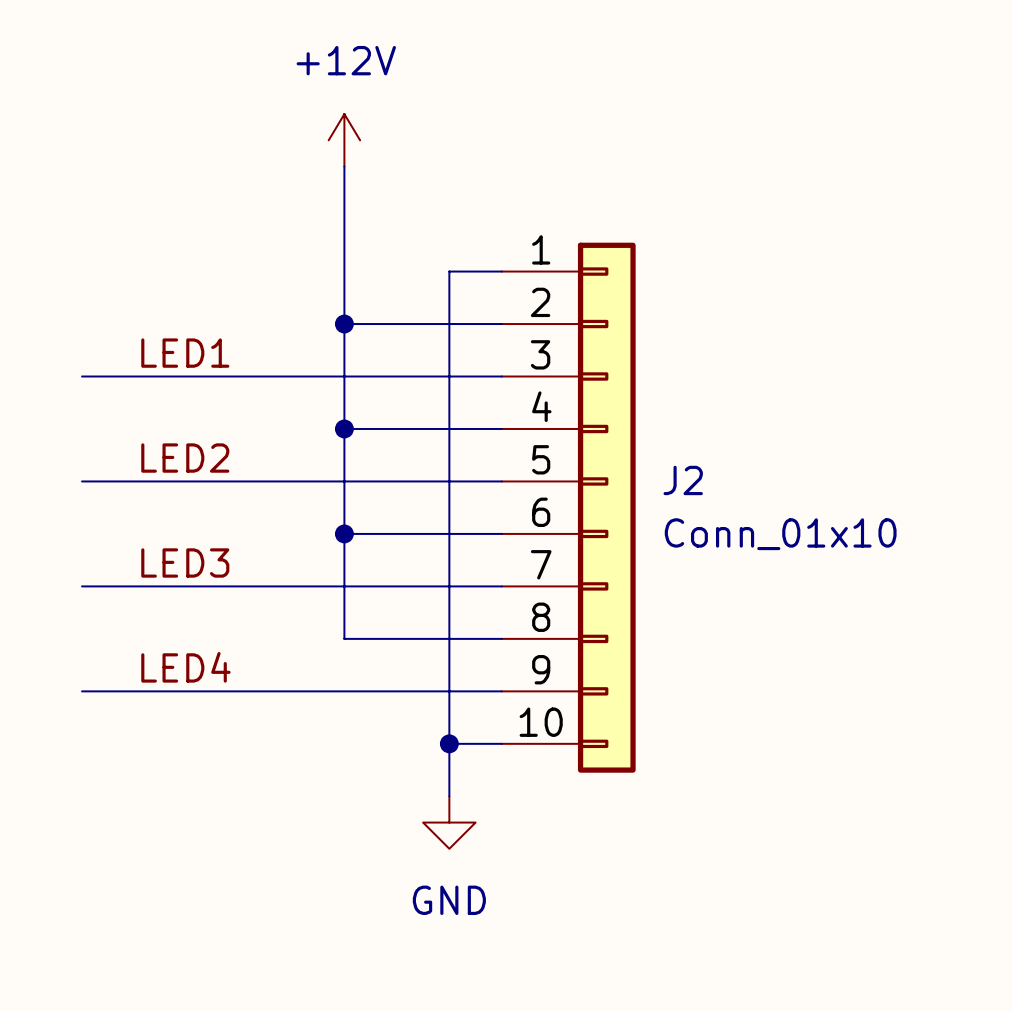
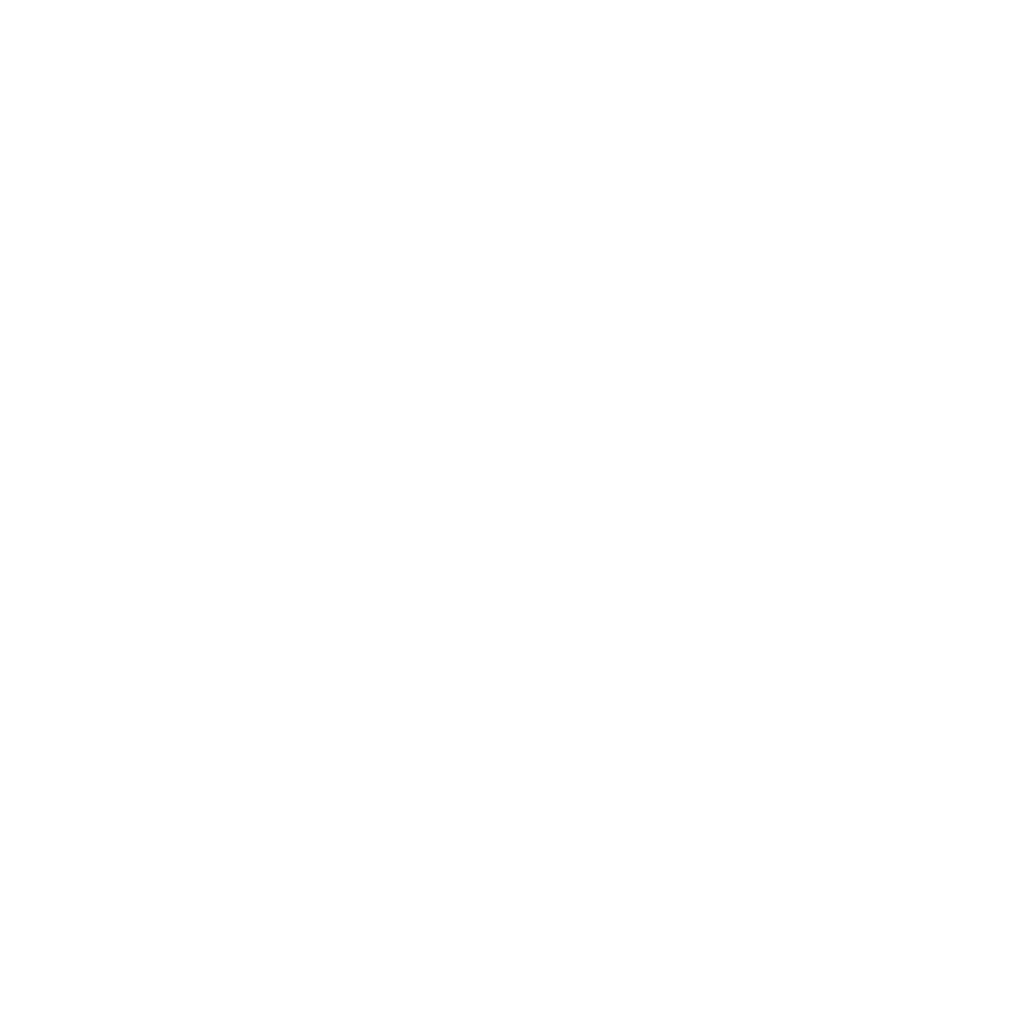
power symbol: +12V (344, 140) -> none
wire: (344, 166) (344, 638) (501, 638) -> none
wire: (501, 271) (449, 271) (449, 796) -> none
wire: (344, 324) (501, 324) -> none
junction: (344, 324) -> none
label: LED1 (185, 353) -> none
wire: (82, 376) (501, 376) -> none
wire: (344, 428) (501, 428) -> none
junction: (344, 428) -> none
label: LED2 (185, 458) -> none
wire: (82, 481) (501, 481) -> none
J2: Conn_01x10 (568, 507) -> none
wire: (344, 533) (501, 533) -> none
junction: (344, 533) -> none
label: LED3 (185, 562) -> none
wire: (82, 586) (501, 586) -> none
label: LED4 (185, 667) -> none
wire: (82, 691) (501, 691) -> none
wire: (449, 743) (501, 743) -> none
junction: (449, 743) -> none
power symbol: GND (449, 822) -> none

